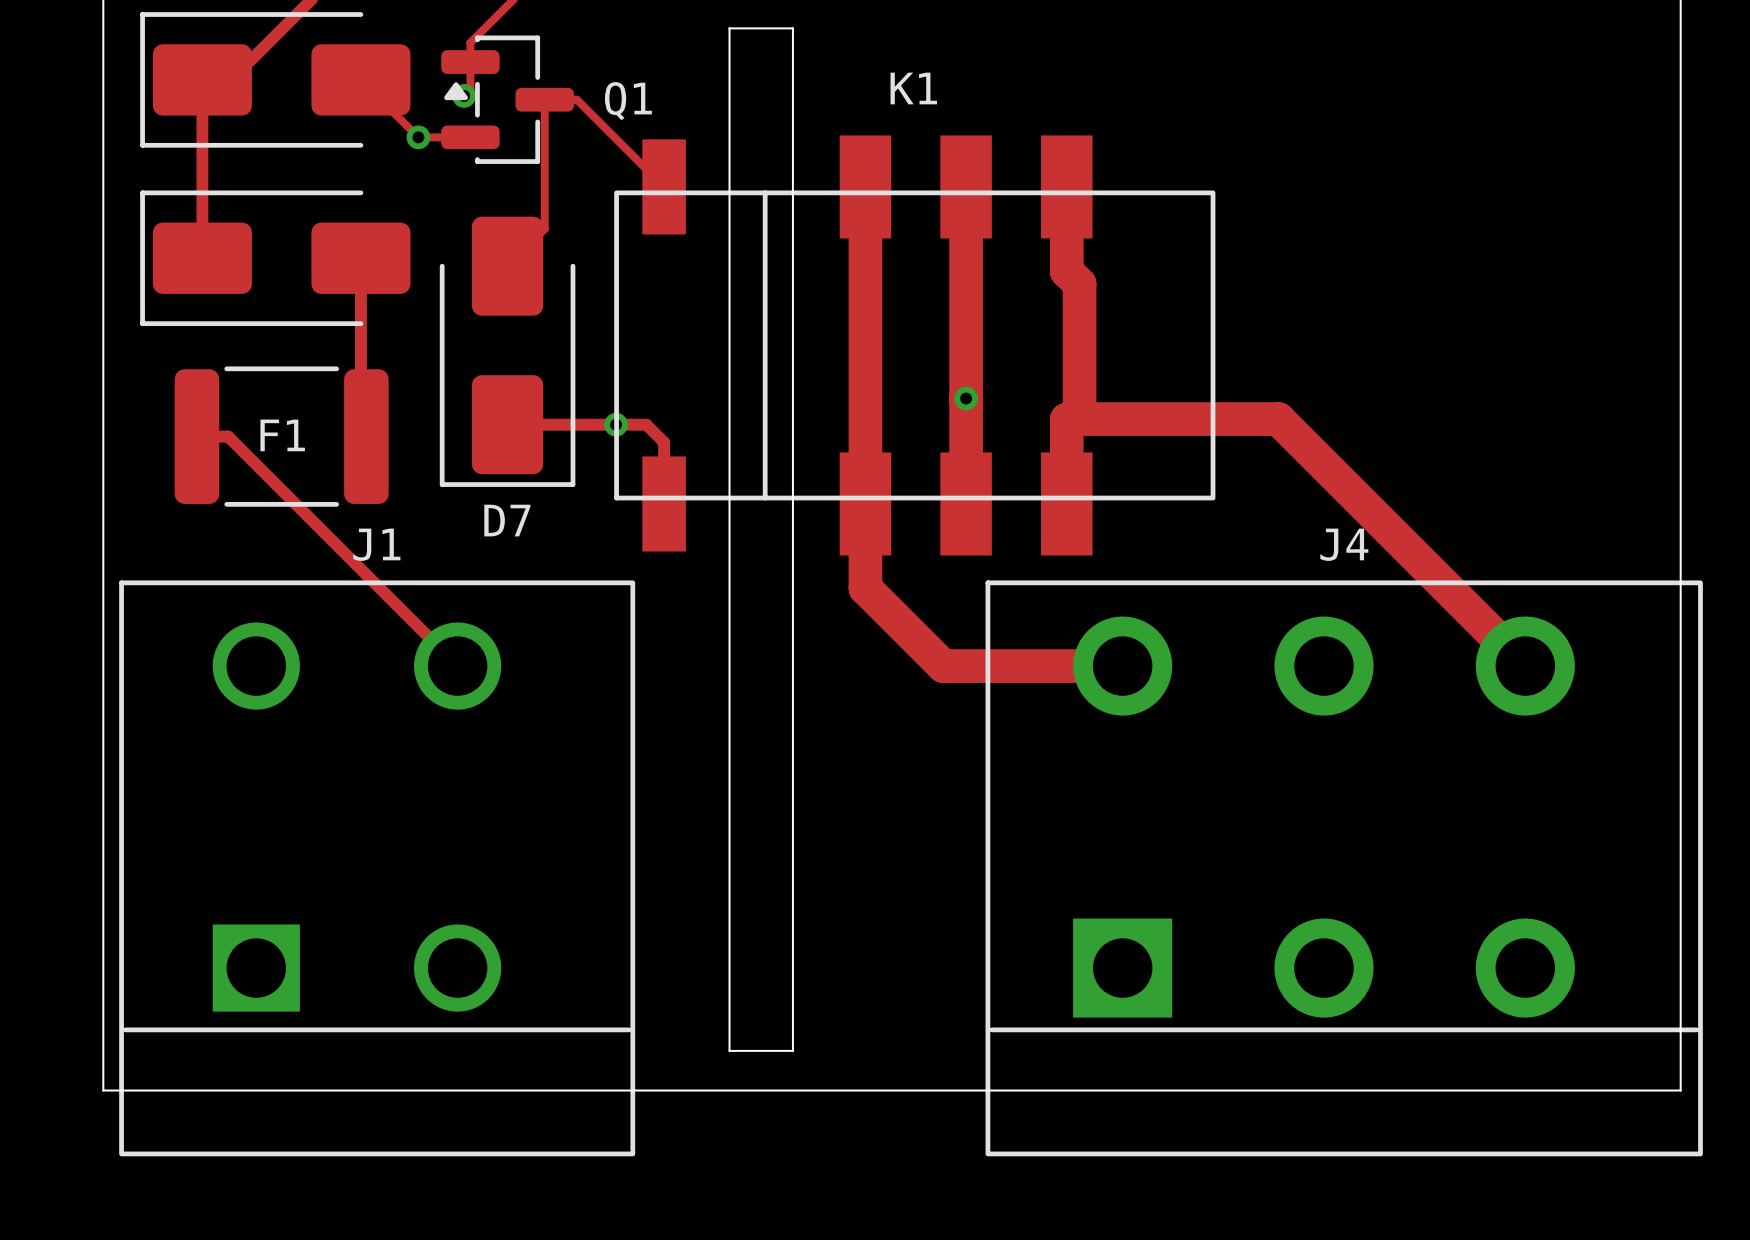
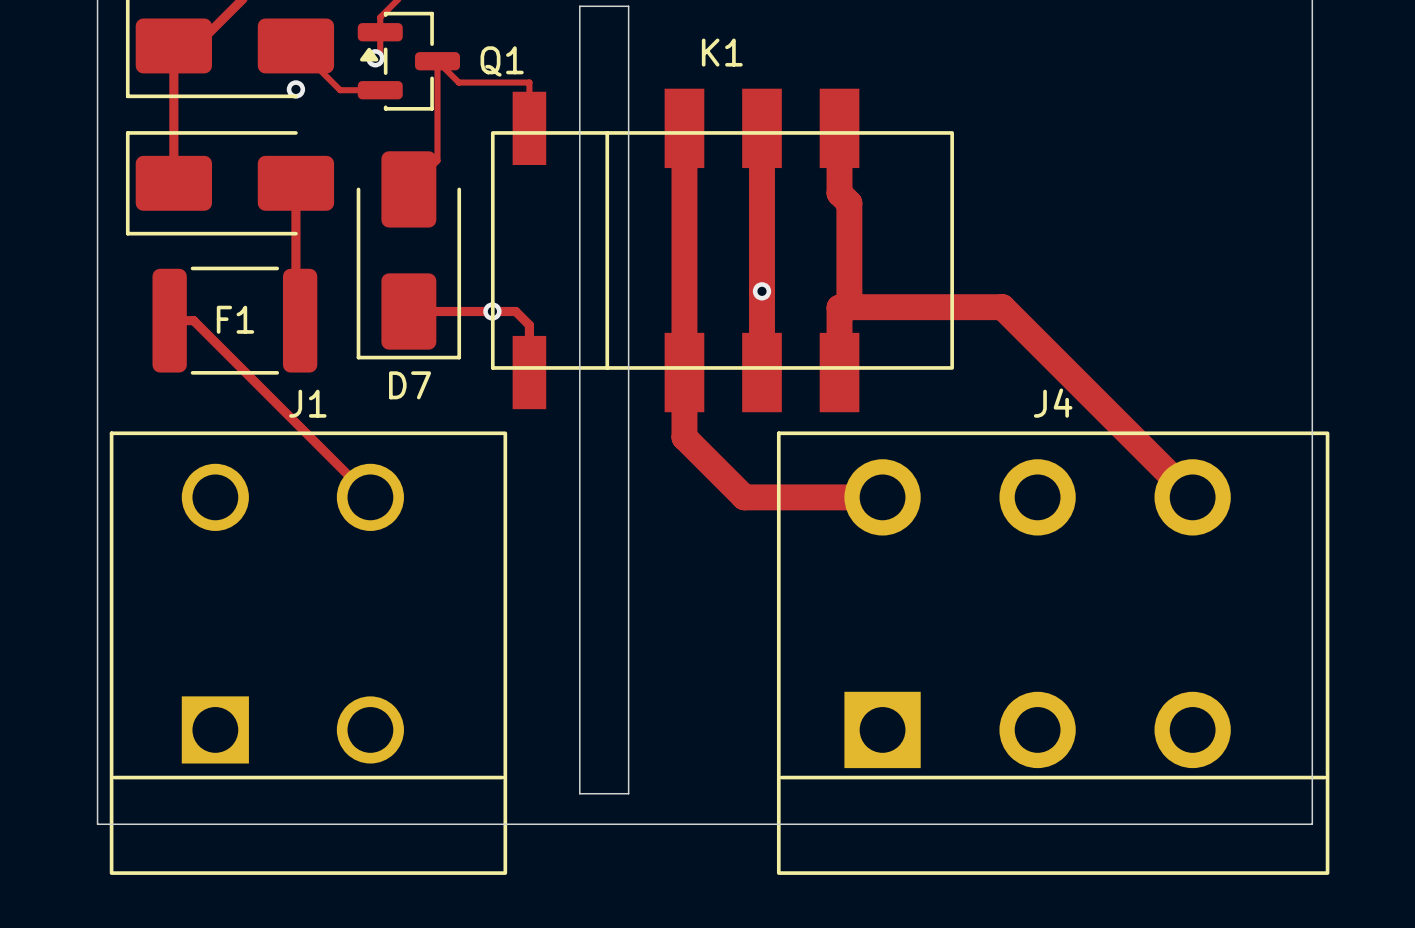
top track: (544, 99) (576, 99) (664, 186) -> (437, 61) (458, 82) (529, 82) (529, 128)
via position: (418, 137) -> (295, 89)

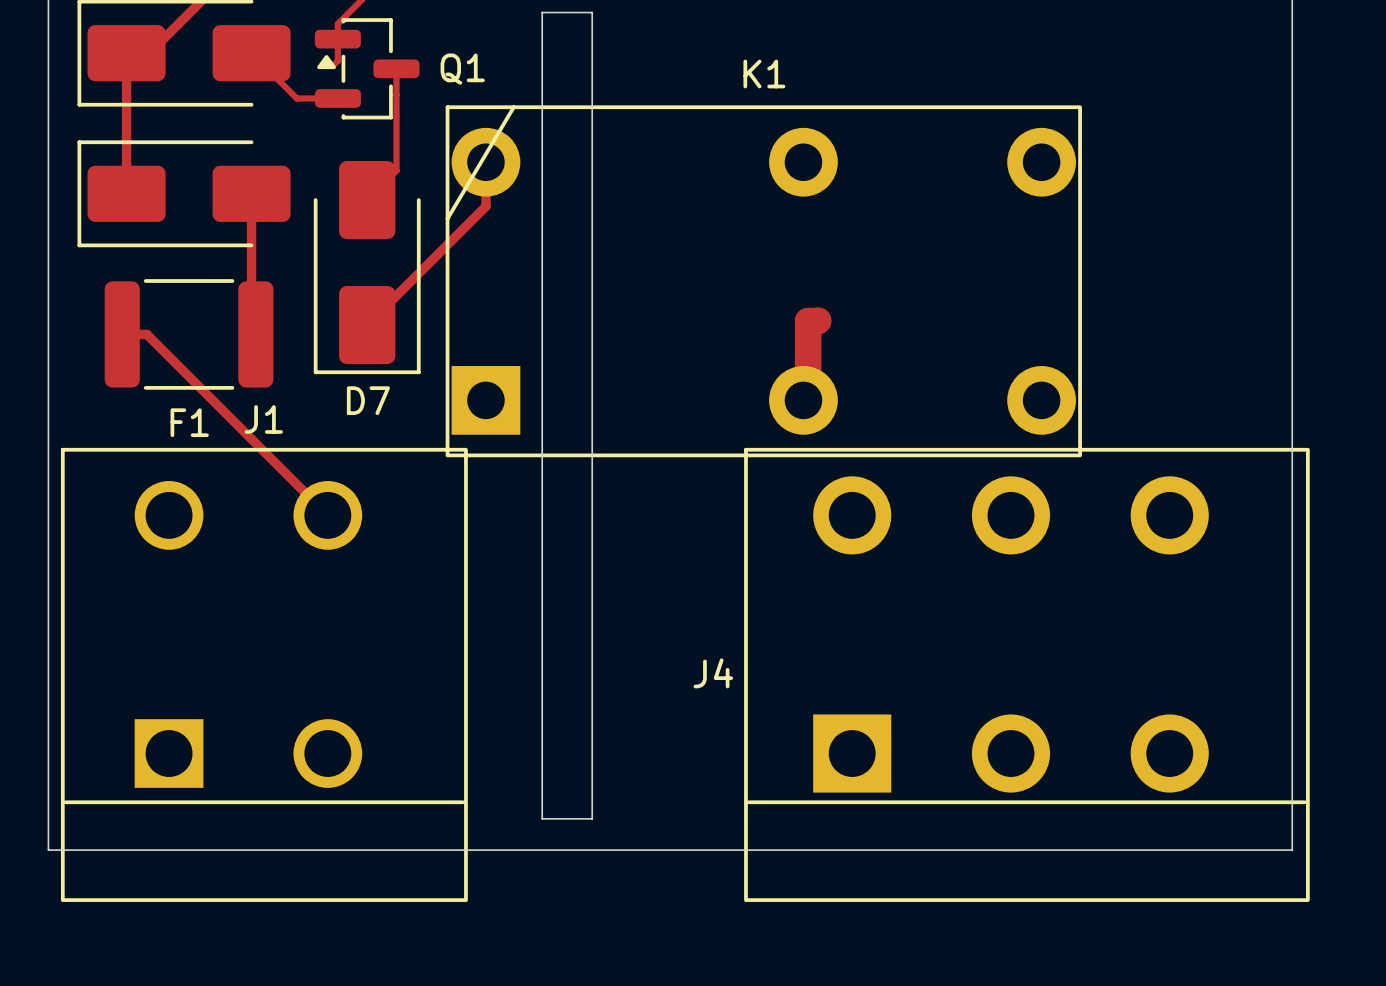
via: (375, 58) -> none
top track: (437, 61) (458, 82) (529, 82) (529, 128) -> none
K1 footprint: [490, 88, 954, 413] -> [445, 105, 1082, 458]
via: (295, 89) -> none
top track: (684, 128) (684, 437) (744, 497) (882, 497) -> none
top track: (762, 128) (762, 372) -> none
top track: (839, 128) (839, 193) (849, 203) (849, 307) (1002, 307) (1192, 497) -> none
via: (762, 291) -> none
top track: (408, 311) (515, 311) (529, 325) (529, 372) -> (367, 325) (485, 206) (485, 162)
via: (492, 311) -> none
F1 name position: F1 (235, 319) -> F1 (189, 422)
J4 name position: J4 (1053, 403) -> J4 (713, 673)

